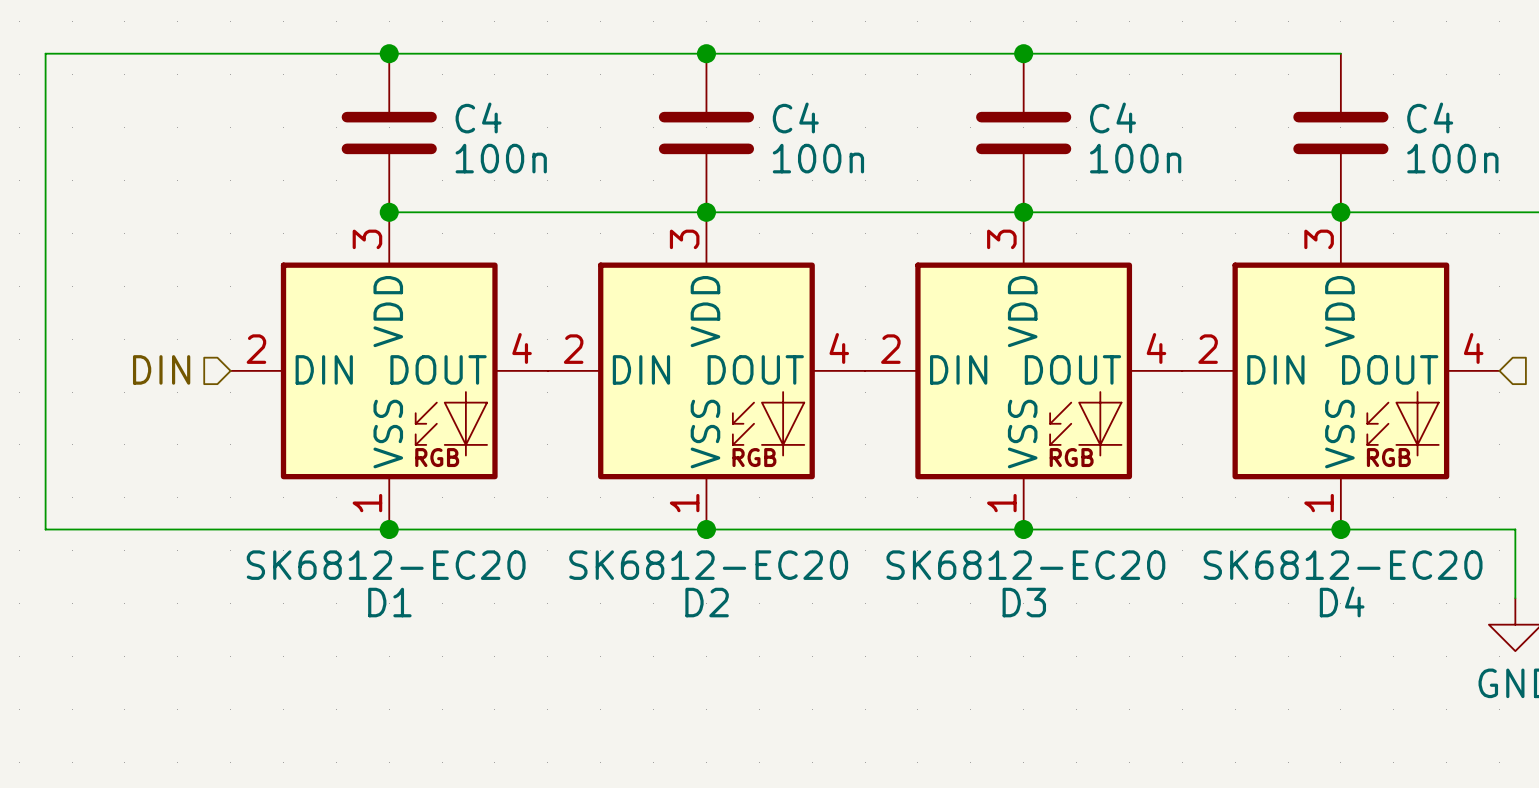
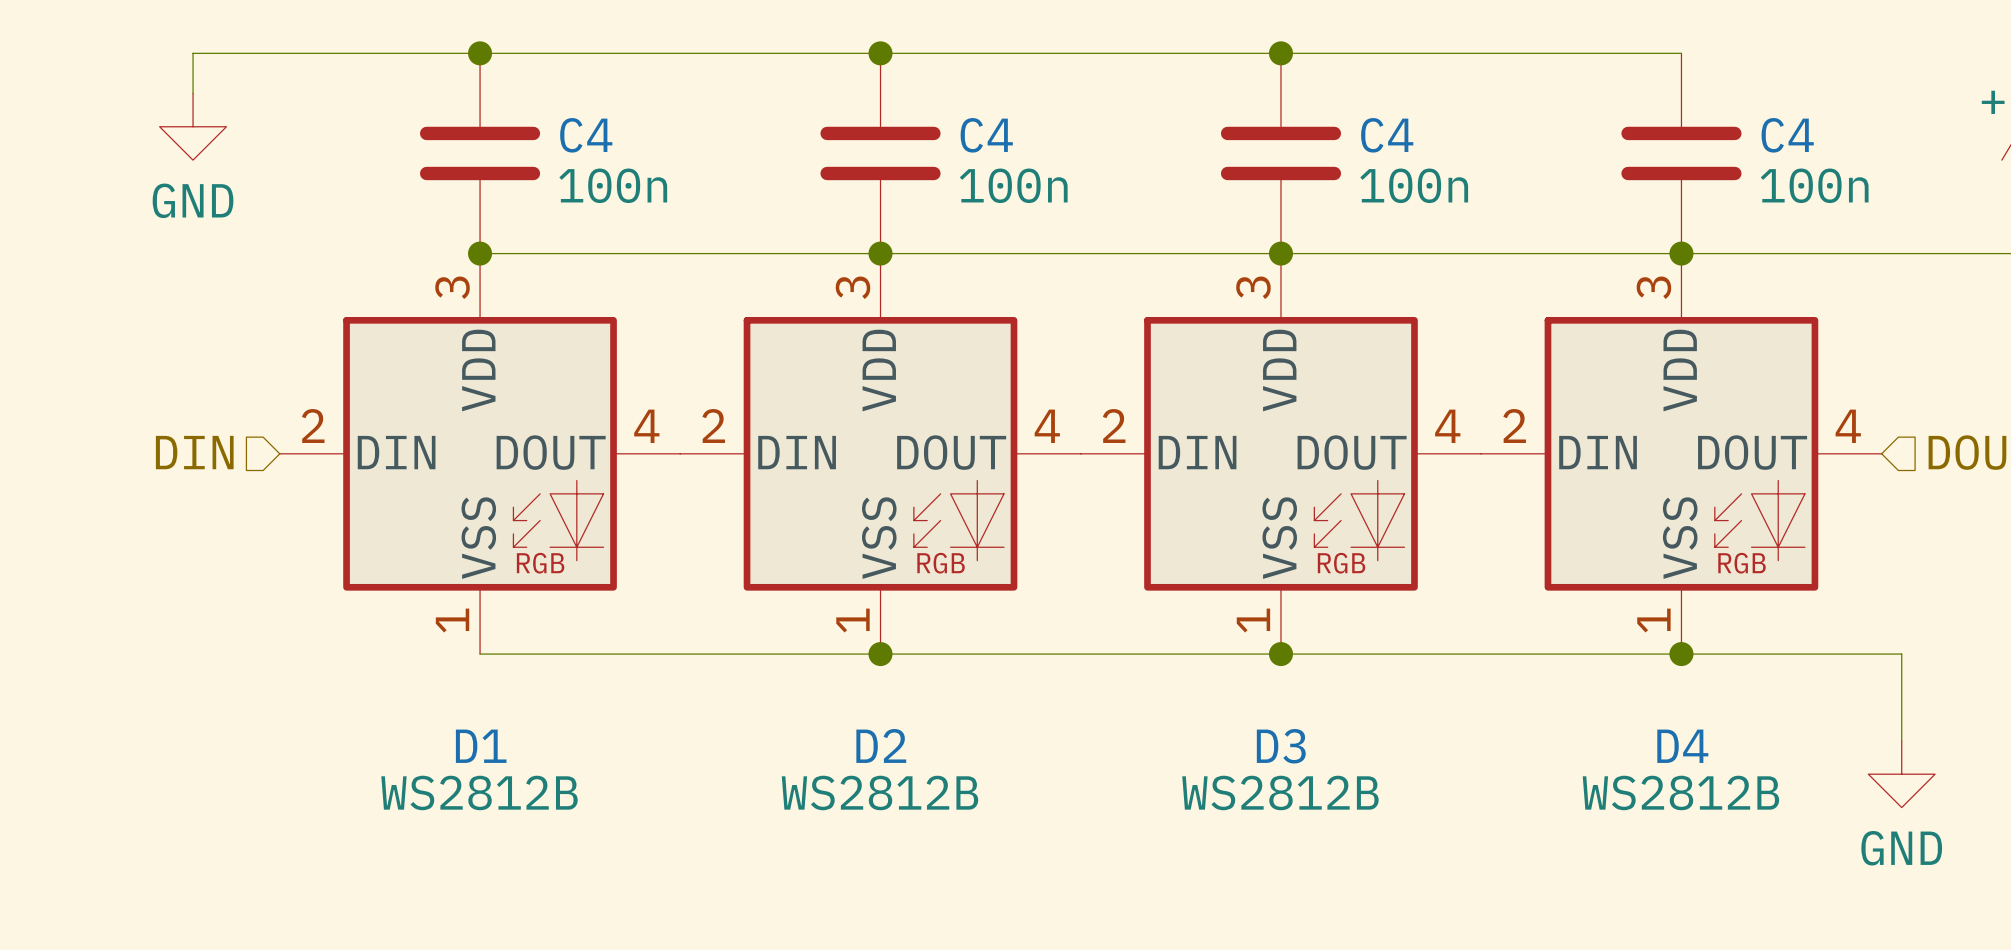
wire: (161, 53) (45, 53) (45, 529) (389, 529) -> (193, 53) (193, 93)
power symbol: none -> GND (193, 126)
junction: (389, 529) -> none
D1 value: SK6812-EC20 (386, 565) -> WS2812B (479, 792)
D2 value: SK6812-EC20 (708, 565) -> WS2812B (879, 792)
D3 value: SK6812-EC20 (1025, 565) -> WS2812B (1280, 792)
D4 value: SK6812-EC20 (1343, 565) -> WS2812B (1680, 792)

